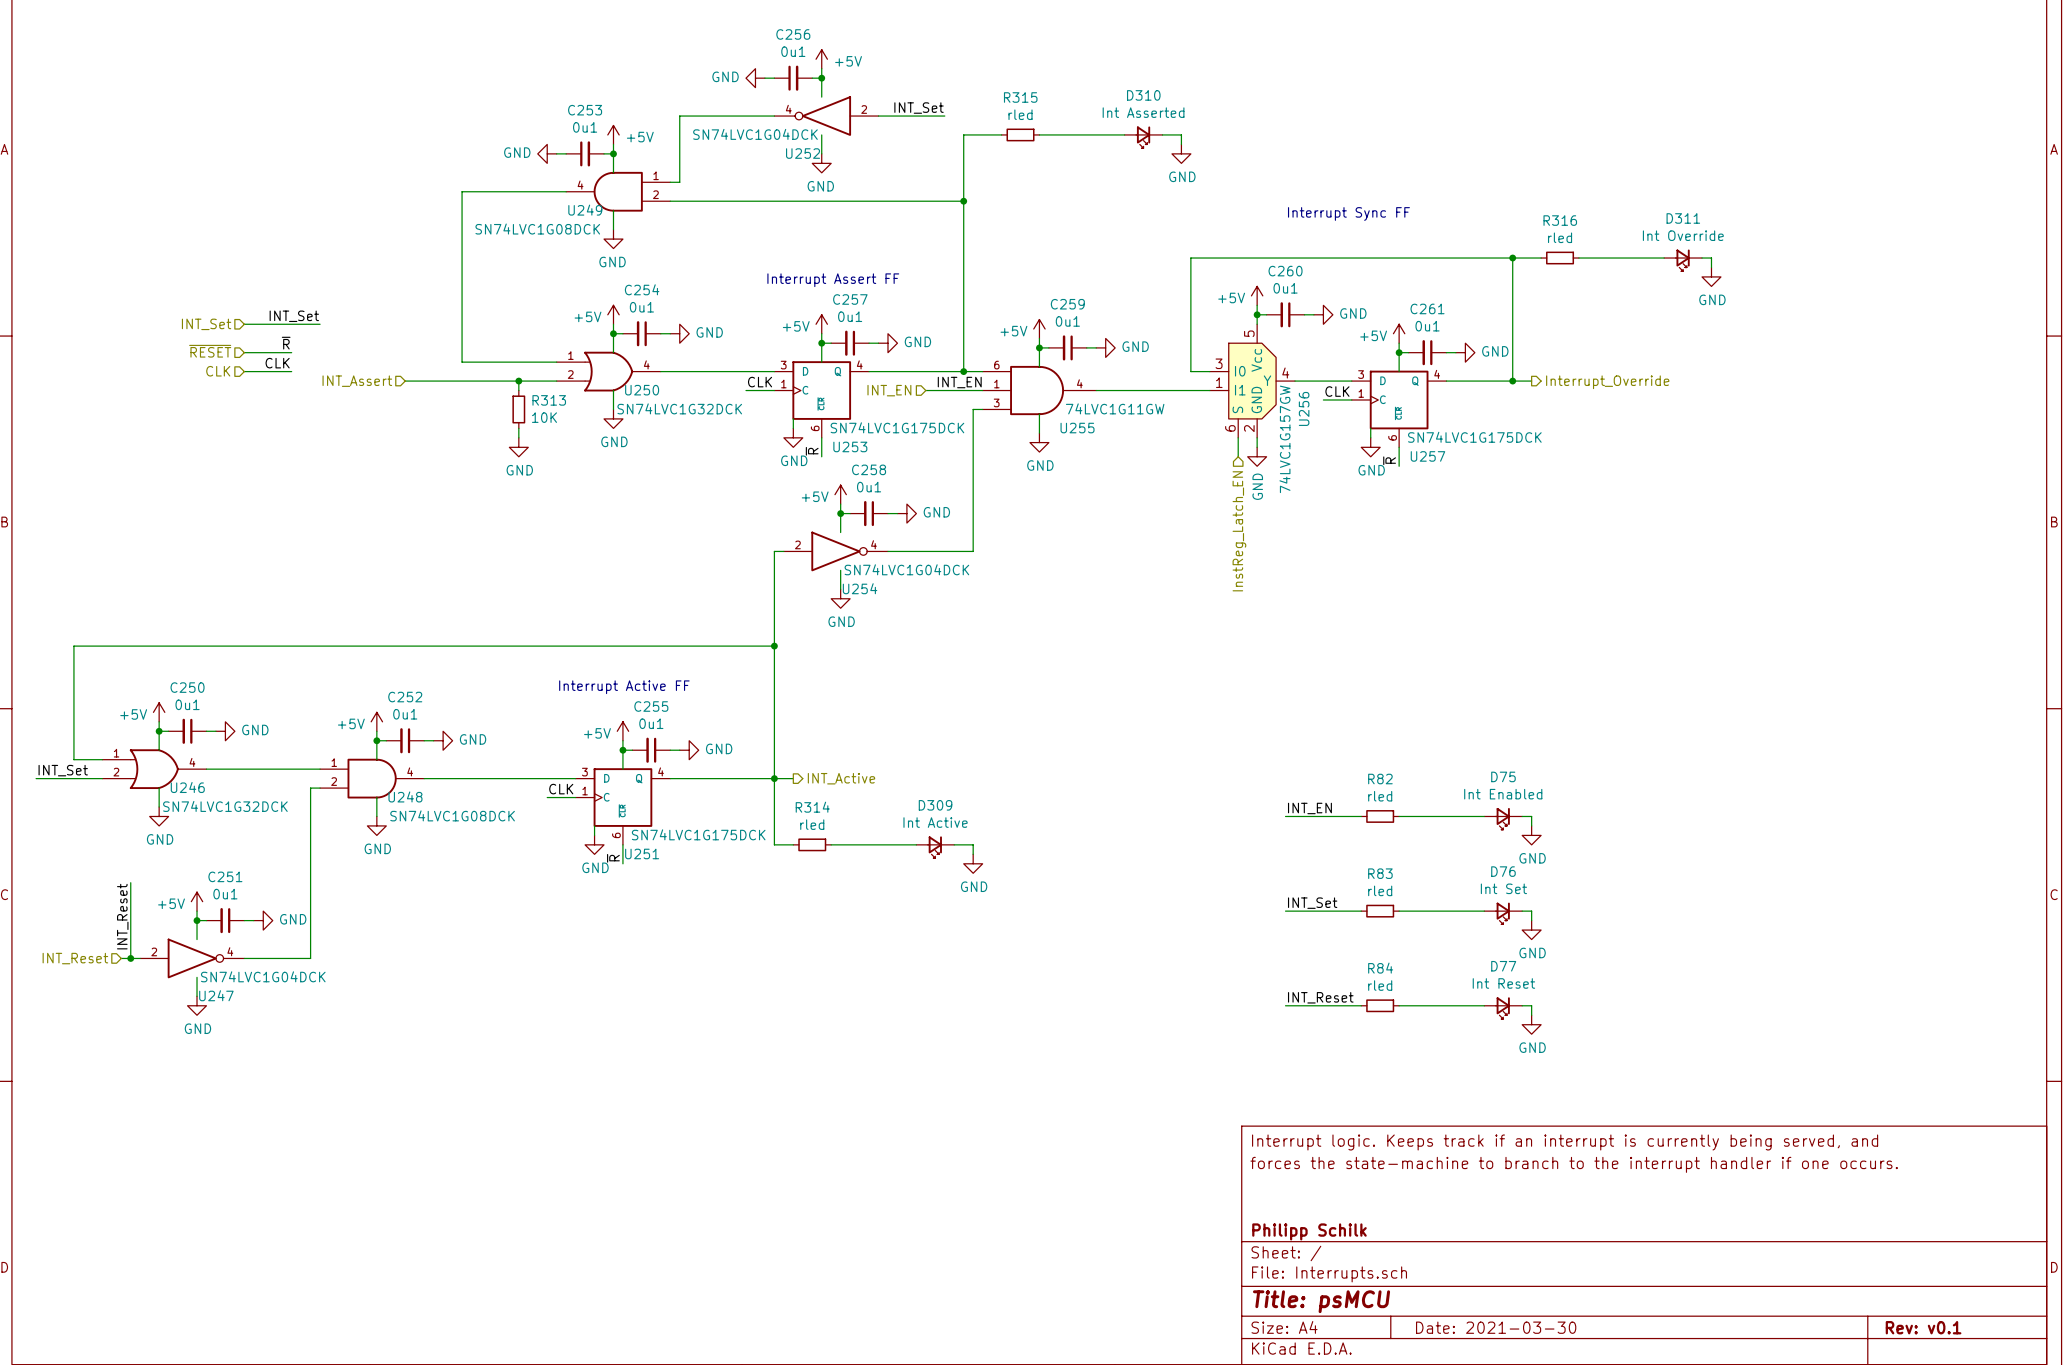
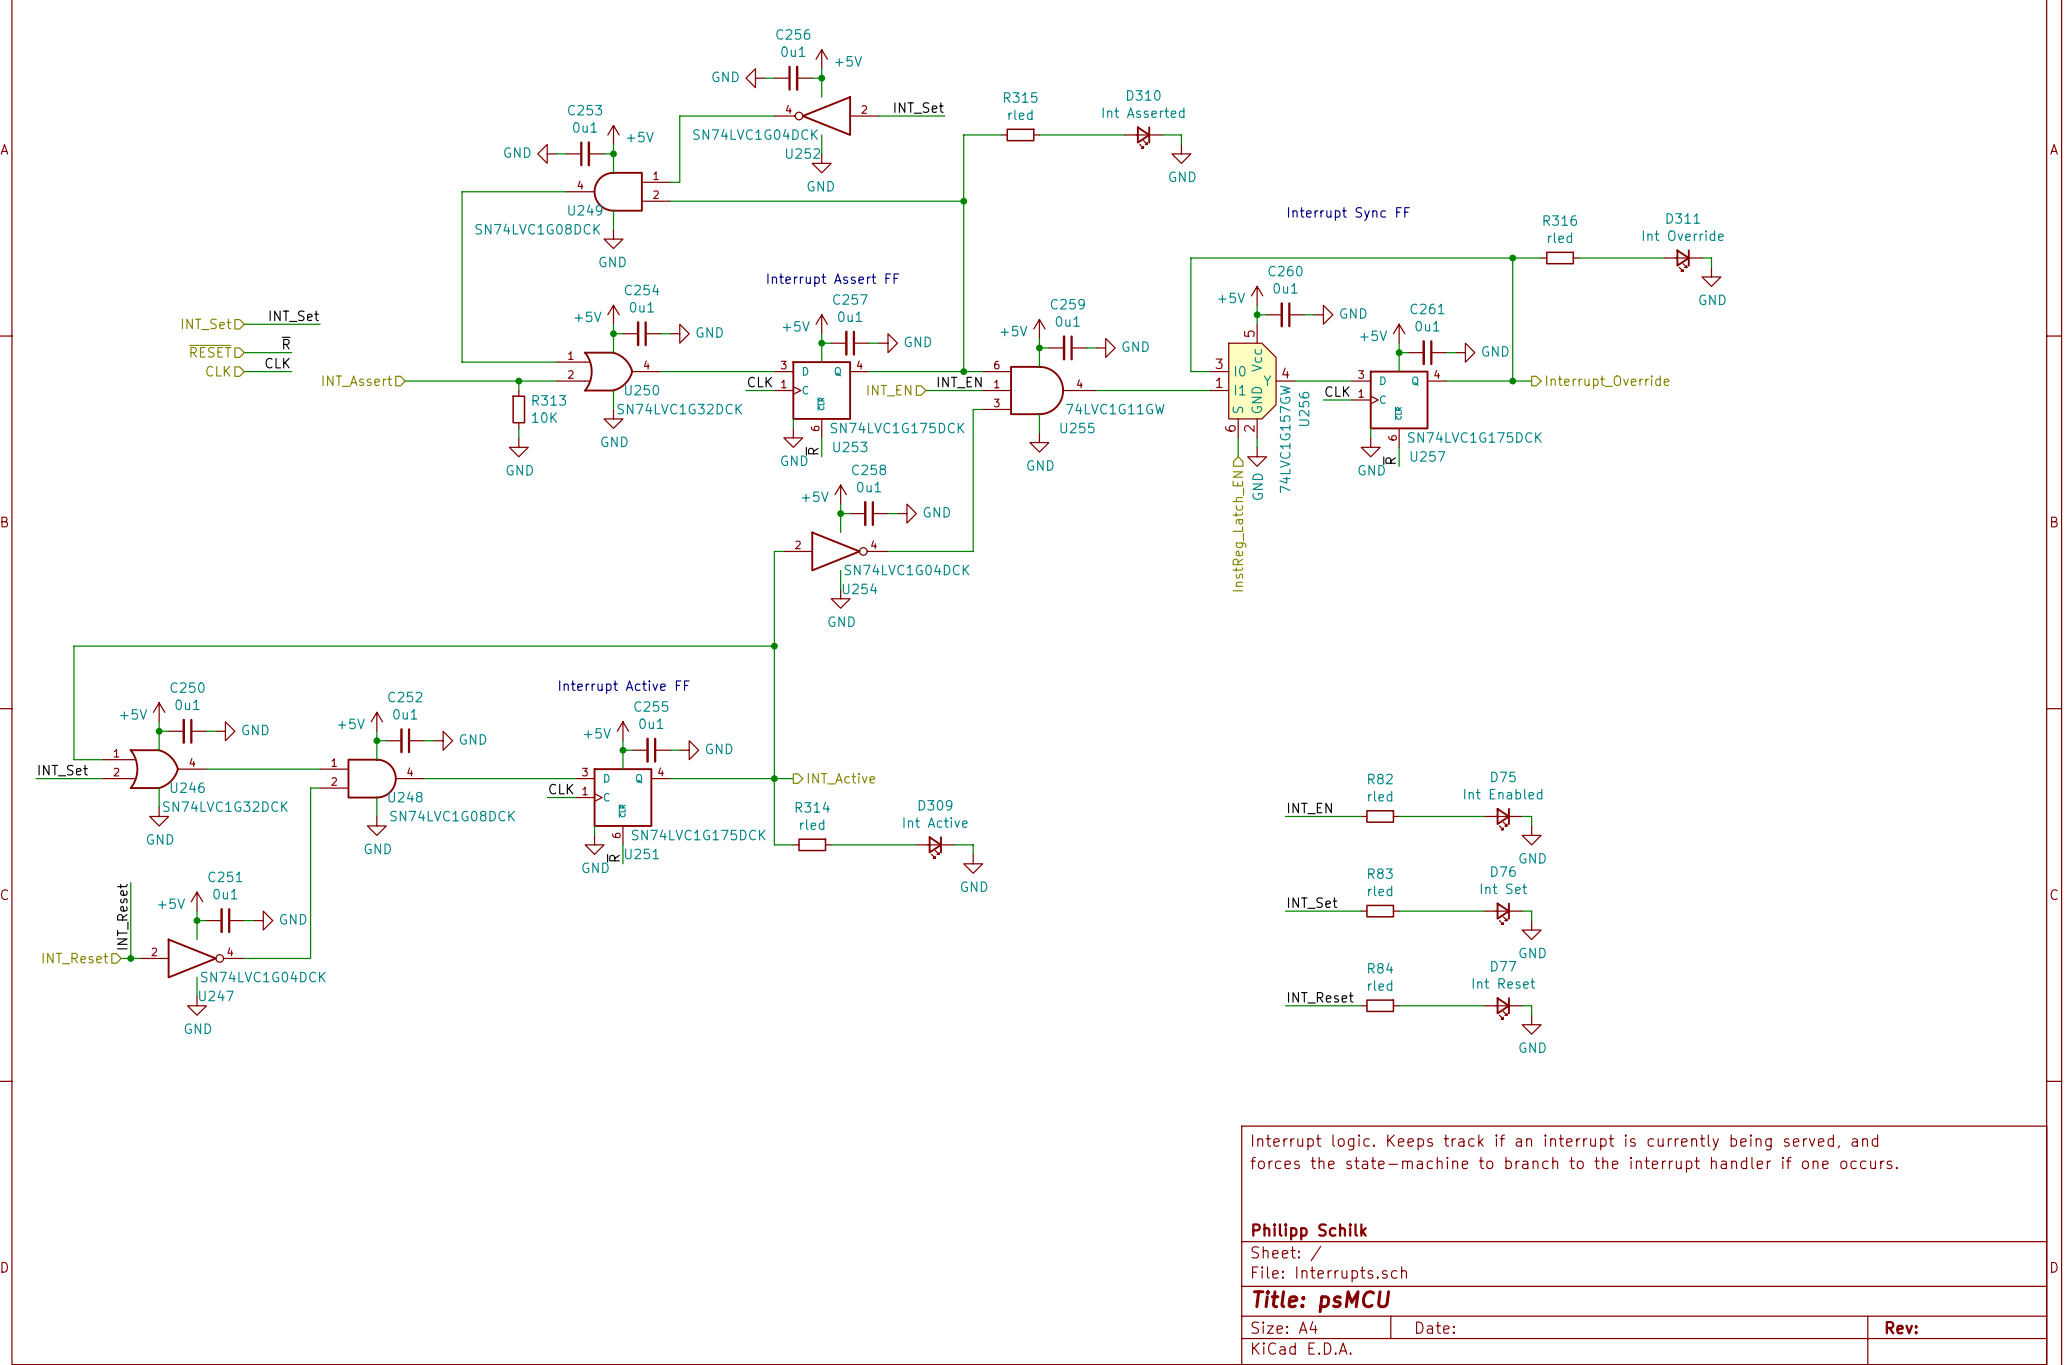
title block: Date: 2021-03-30 (1496, 1327) -> Date: (1435, 1327)
title block: Rev: v0.1 (1923, 1327) -> Rev: (1901, 1327)

